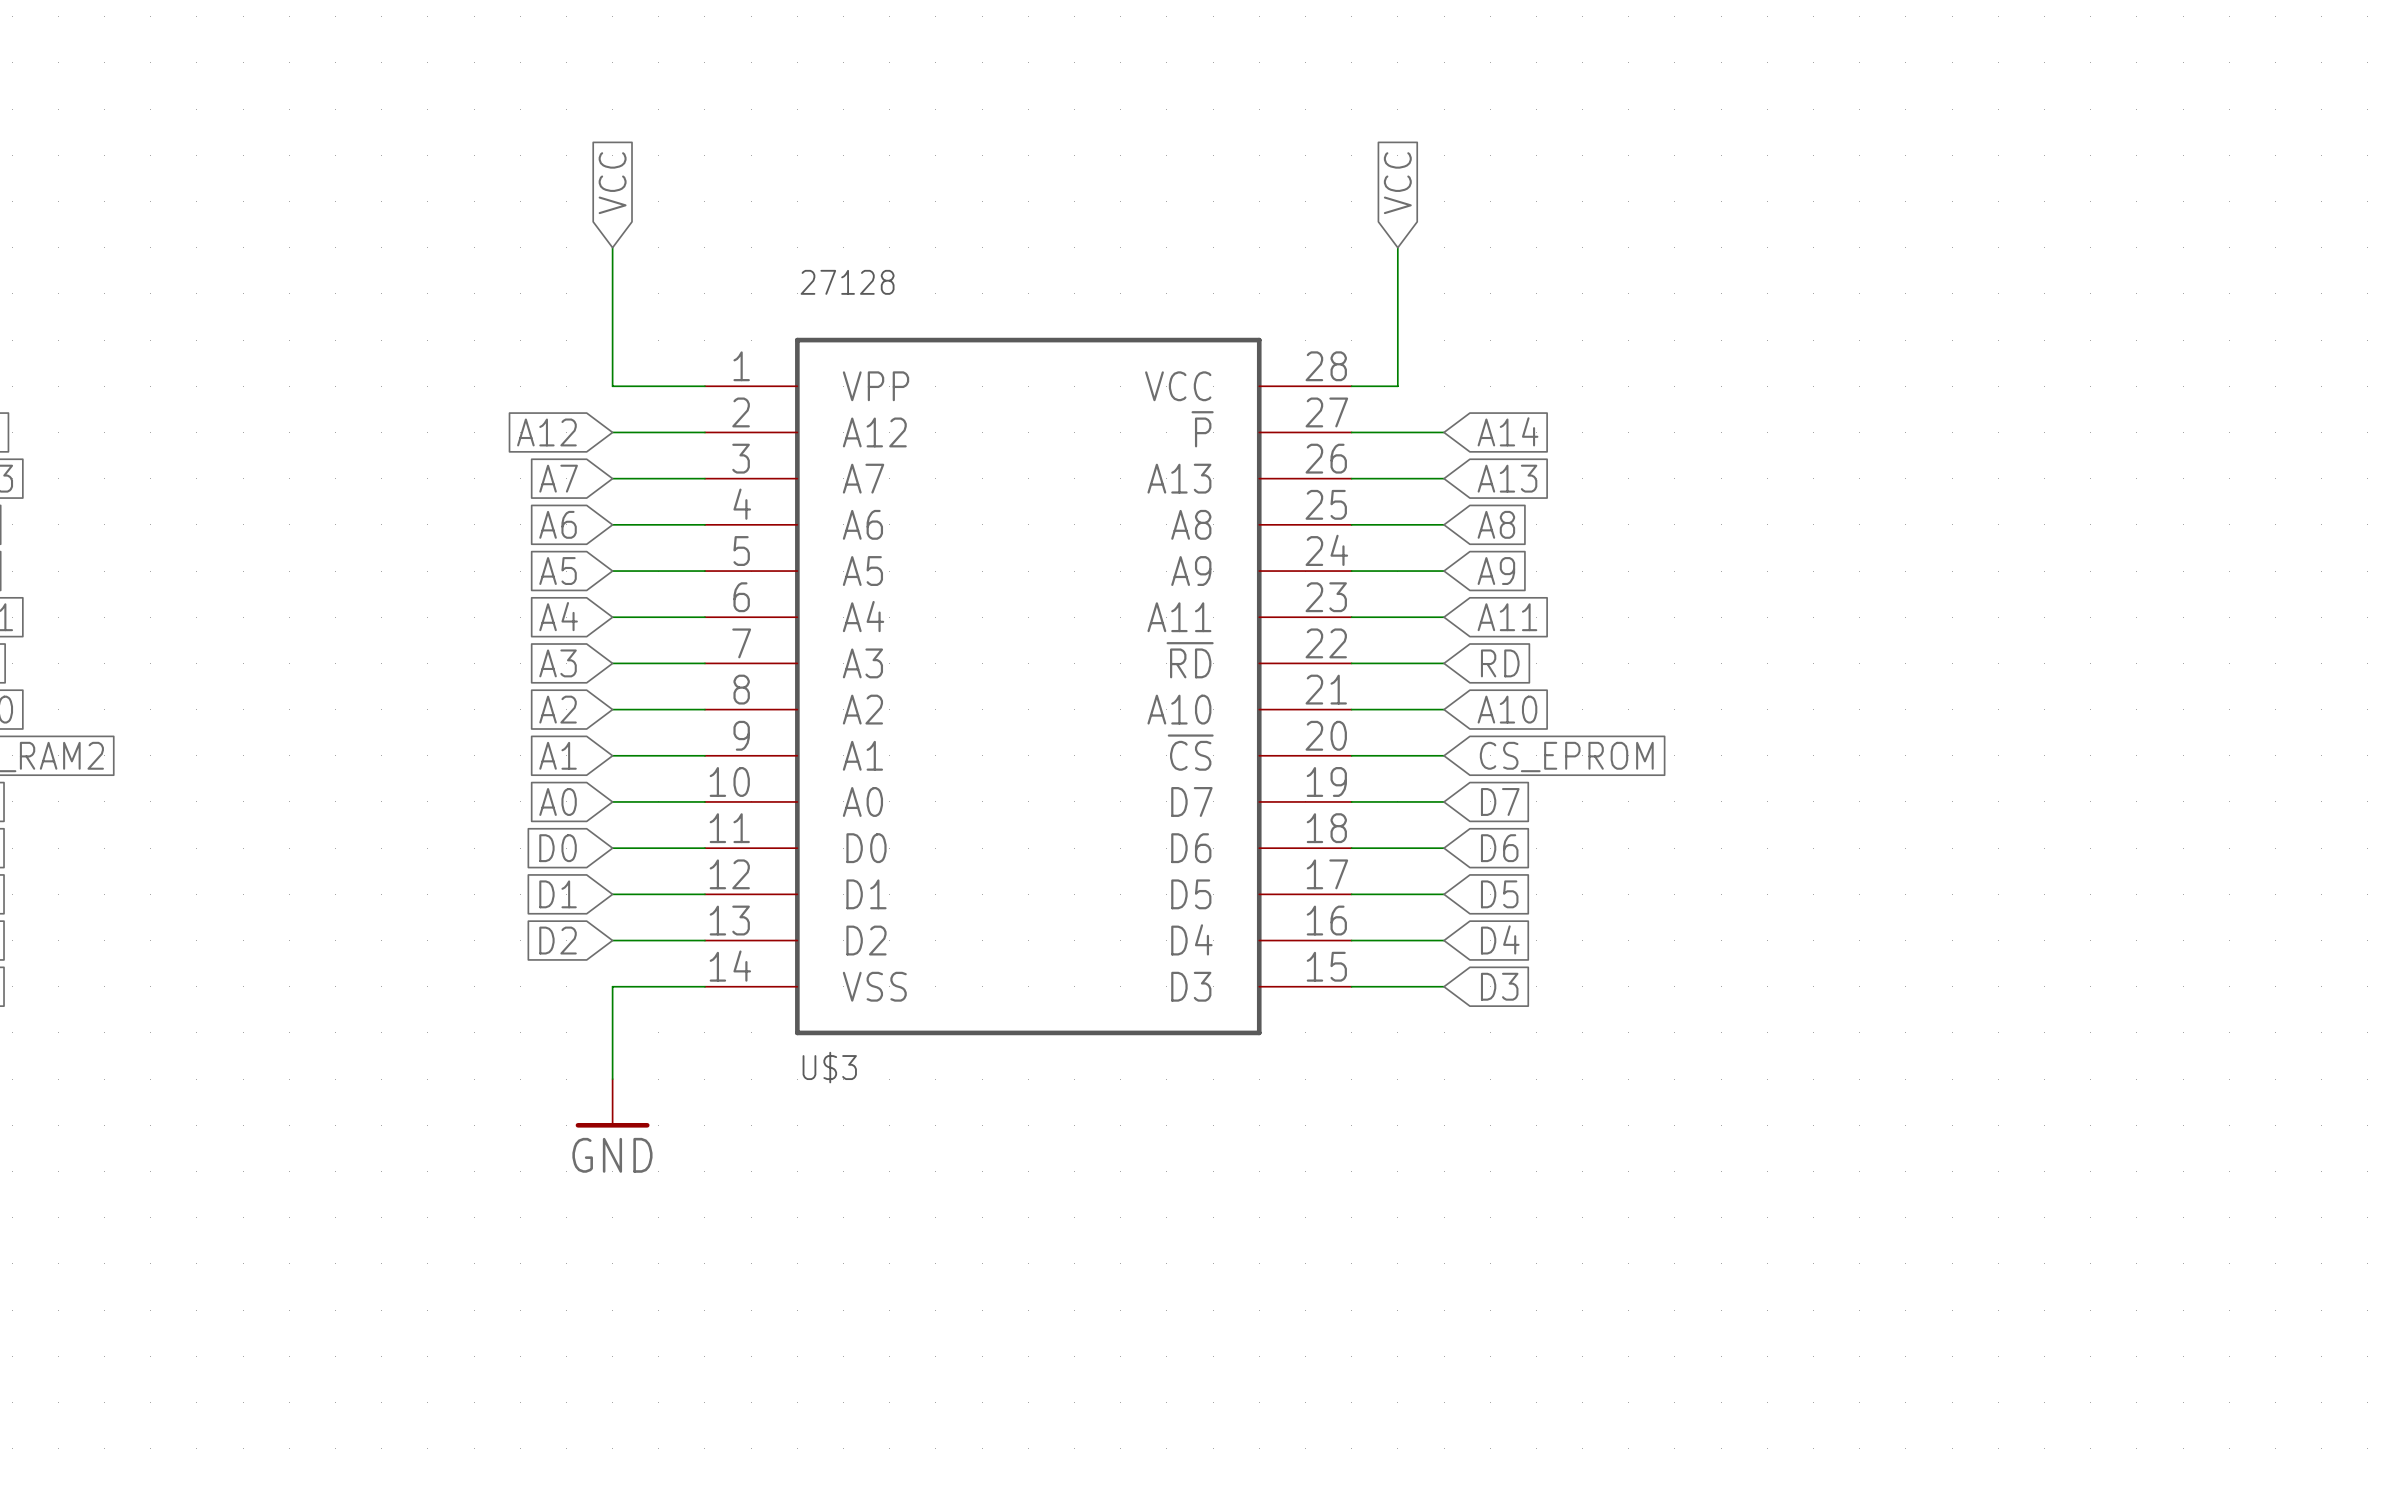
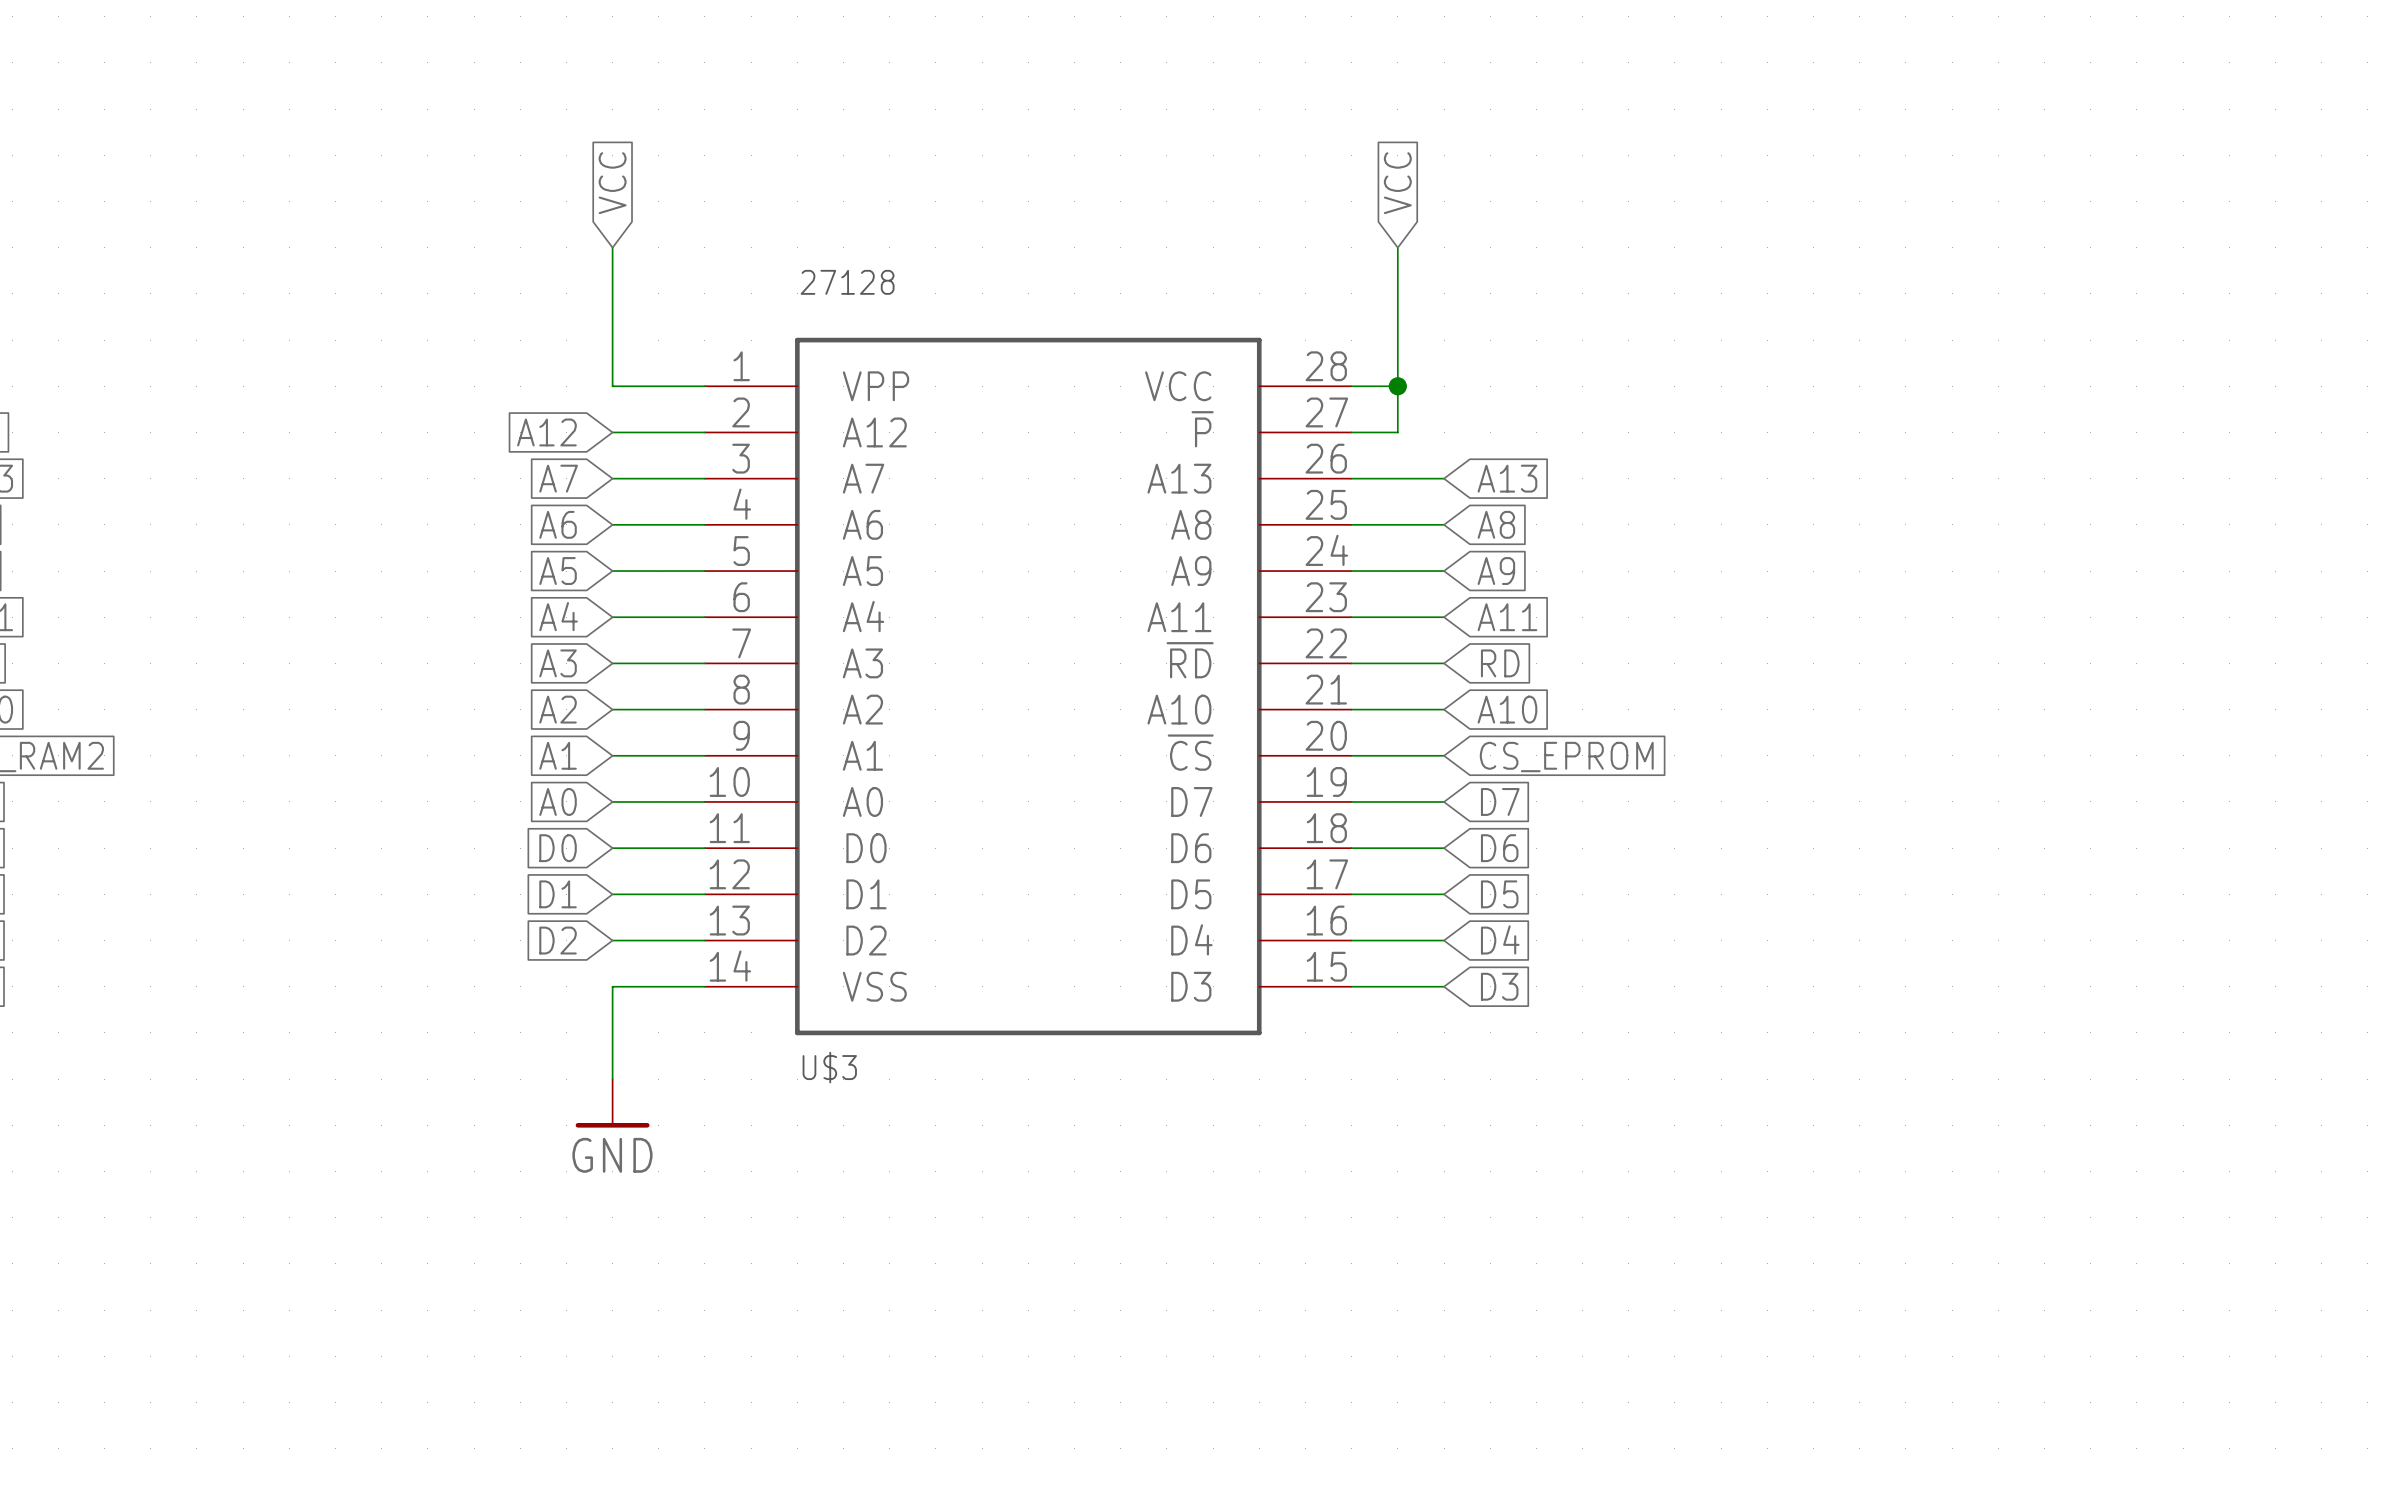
junction: none -> (1397, 386)
global label: A14 (1508, 431) -> none
wire: (1397, 432) (1444, 432) -> (1397, 432) (1397, 386)

